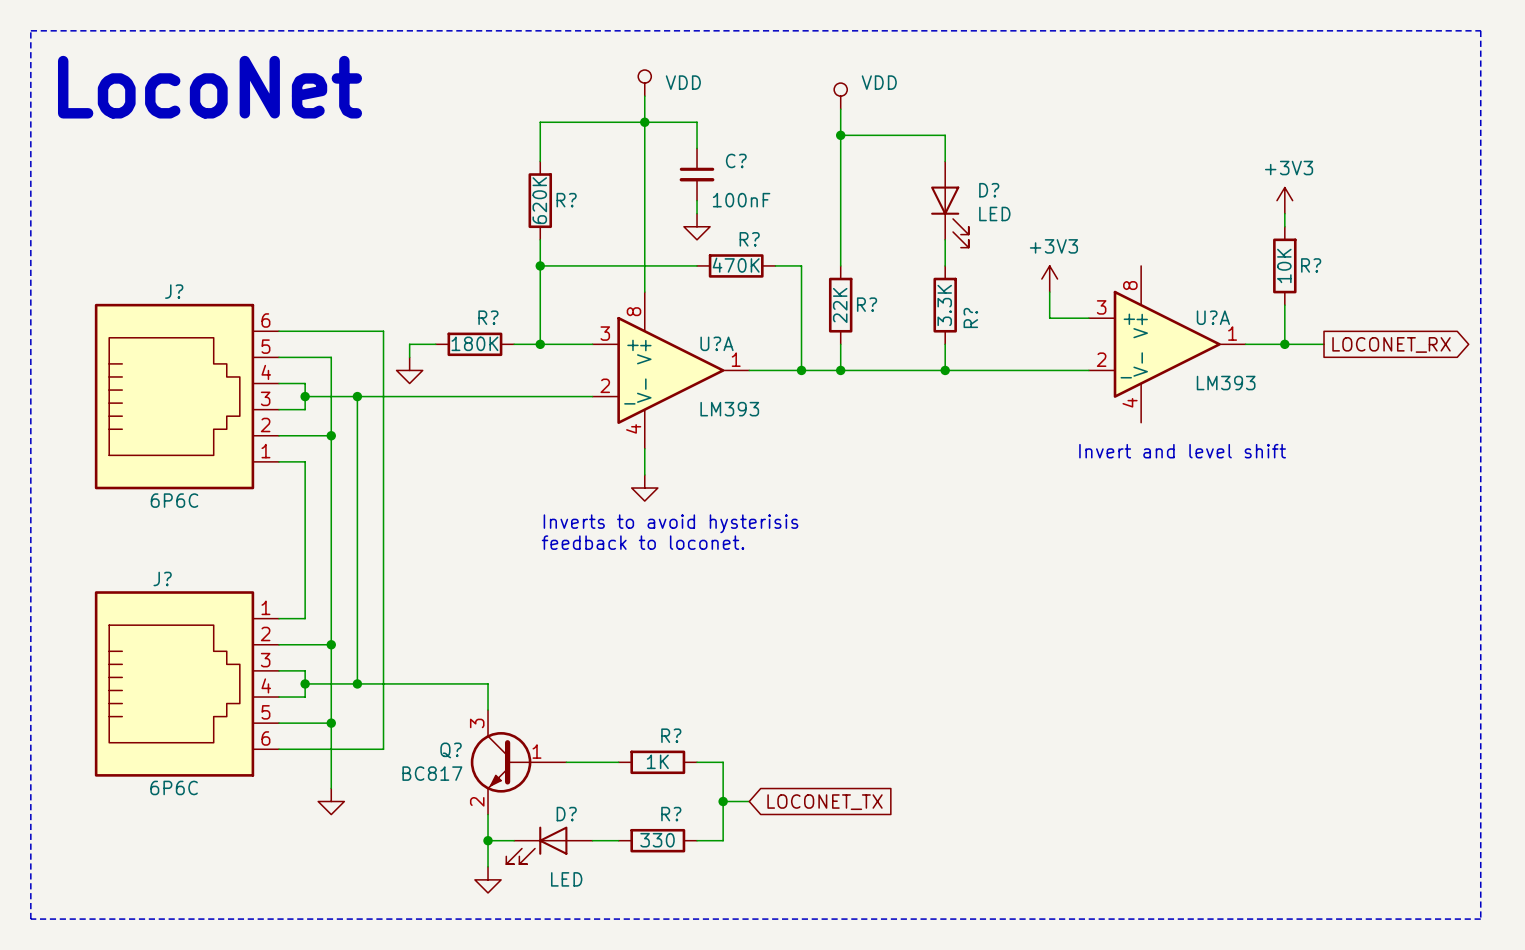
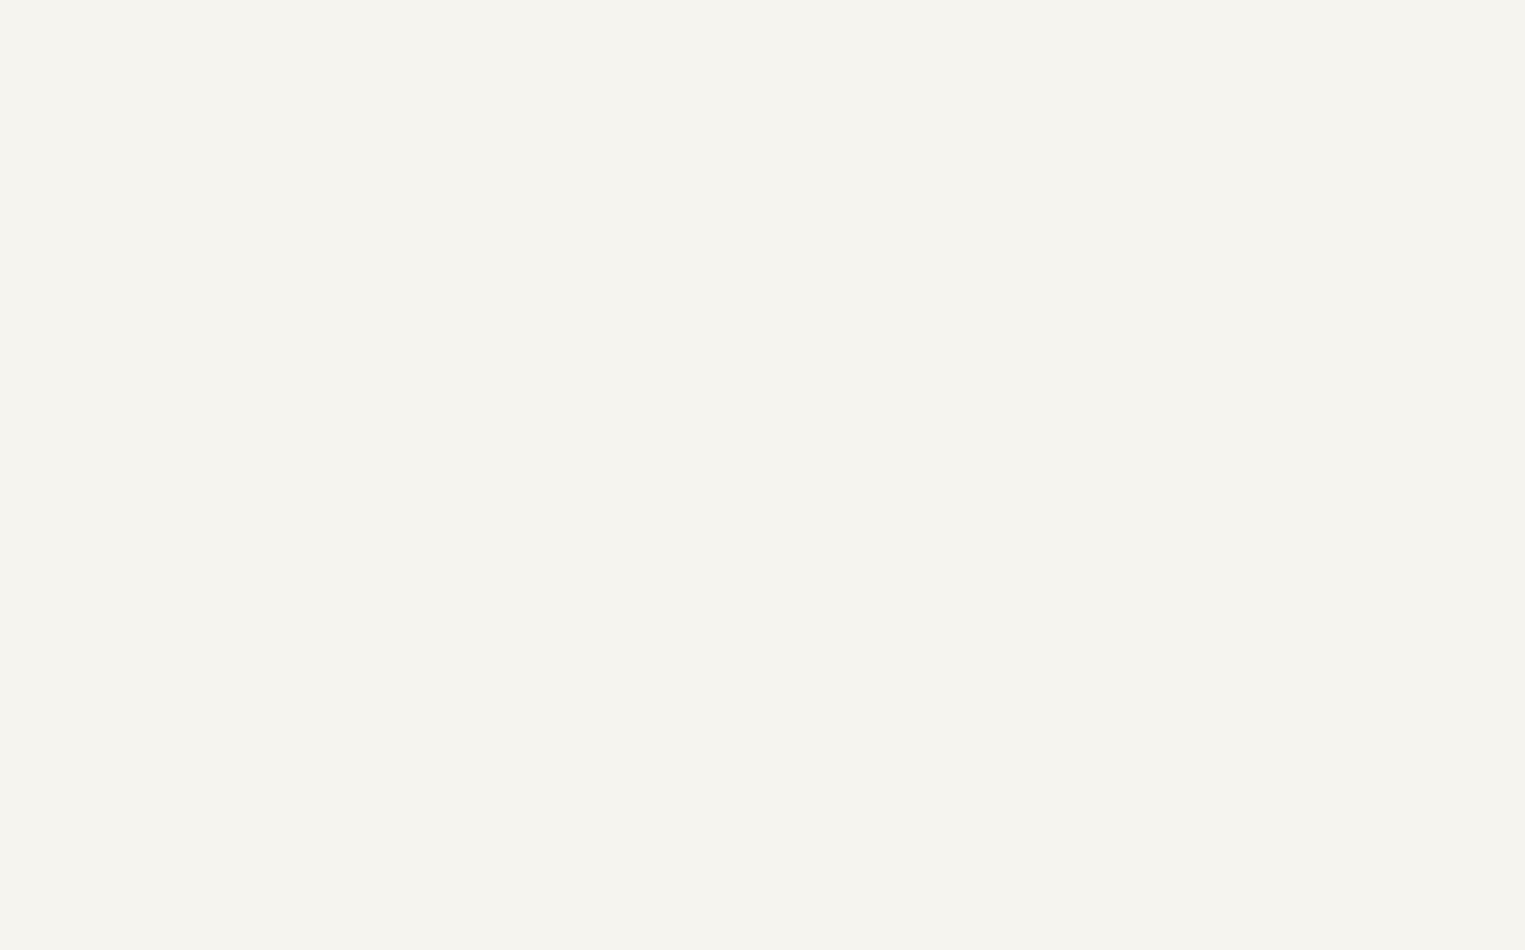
line: (30, 30) (1480, 30) (1480, 919) (30, 919) (30, 30) -> none
power symbol: VDD (644, 83) -> none
text: LocoNet (210, 87) -> none
wire: (644, 96) (644, 292) -> none
power symbol: VDD (840, 96) -> none
wire: (840, 109) (840, 265) -> none
junction: (644, 122) -> none
wire: (840, 135) (945, 135) (945, 161) -> none
junction: (840, 135) -> none
wire: (697, 148) (697, 122) (540, 122) (540, 161) -> none
C?: 100nF (697, 174) -> none
R?: 620K (540, 200) -> none
wire: (697, 200) (697, 213) -> none
power symbol: +3V3 (1284, 200) -> none
D?: LED (949, 204) -> none
wire: (1284, 213) (1284, 226) -> none
power symbol: (697, 226) -> none
wire: (540, 239) (540, 344) -> none
wire: (945, 239) (945, 265) -> none
wire: (540, 265) (697, 265) -> none
junction: (540, 265) -> none
R?: 470K (736, 265) -> none
wire: (775, 265) (801, 265) (801, 370) -> none
R?: 10K (1284, 265) -> none
power symbol: +3V3 (1049, 279) -> none
wire: (1049, 292) (1049, 318) (1088, 318) -> none
R?: 22K (840, 305) -> none
R?: 3.3K (945, 305) -> none
wire: (1284, 305) (1284, 344) -> none
wire: (279, 331) (383, 331) (383, 749) (279, 749) -> none
wire: (435, 344) (409, 344) (409, 357) -> none
R?: 180K (474, 344) -> none
wire: (514, 344) (592, 344) -> none
junction: (540, 344) -> none
wire: (840, 344) (840, 370) -> none
wire: (945, 344) (945, 370) -> none
U?A: LM393 (1167, 344) -> none
wire: (1245, 344) (1324, 344) -> none
junction: (1284, 344) -> none
global label: LOCONET_RX (1391, 344) -> none
wire: (279, 357) (331, 357) (331, 788) -> none
power symbol: (409, 370) -> none
U?A: LM393 (670, 370) -> none
wire: (749, 370) (1088, 370) -> none
junction: (801, 370) -> none
junction: (840, 370) -> none
junction: (945, 370) -> none
wire: (279, 383) (305, 383) (305, 409) (279, 409) -> none
J?: 6P6C (186, 396) -> none
wire: (305, 396) (592, 396) -> none
junction: (305, 396) -> none
wire: (357, 396) (357, 683) -> none
junction: (357, 396) -> none
wire: (279, 435) (331, 435) -> none
junction: (331, 435) -> none
wire: (644, 448) (644, 474) -> none
text: Invert and level shift (1182, 451) -> none
wire: (279, 461) (305, 461) (305, 618) (279, 618) -> none
power symbol: (644, 488) -> none
text: Inverts to avoid hysterisis (670, 523) -> none
text: feedback to loconet. (642, 542) -> none
wire: (279, 644) (331, 644) -> none
junction: (331, 644) -> none
wire: (279, 670) (305, 670) (305, 697) (279, 697) -> none
J?: 6P6C (186, 683) -> none
wire: (305, 683) (488, 683) (488, 710) -> none
junction: (305, 683) -> none
junction: (357, 683) -> none
wire: (279, 723) (331, 723) -> none
junction: (331, 723) -> none
Q?: BC817 (518, 762) -> none
wire: (566, 762) (618, 762) -> none
R?: 1K (657, 762) -> none
wire: (697, 762) (723, 762) (723, 840) (697, 840) -> none
power symbol: (331, 801) -> none
wire: (723, 801) (749, 801) -> none
junction: (723, 801) -> none
global label: LOCONET_TX (825, 802) -> none
wire: (488, 814) (488, 866) -> none
wire: (488, 840) (514, 840) -> none
junction: (488, 840) -> none
wire: (592, 840) (618, 840) -> none
R?: 330 (657, 840) -> none
D?: LED (549, 845) -> none
power symbol: (488, 879) -> none

